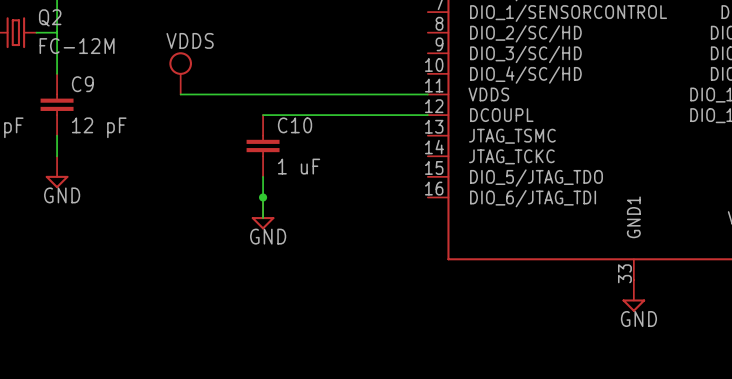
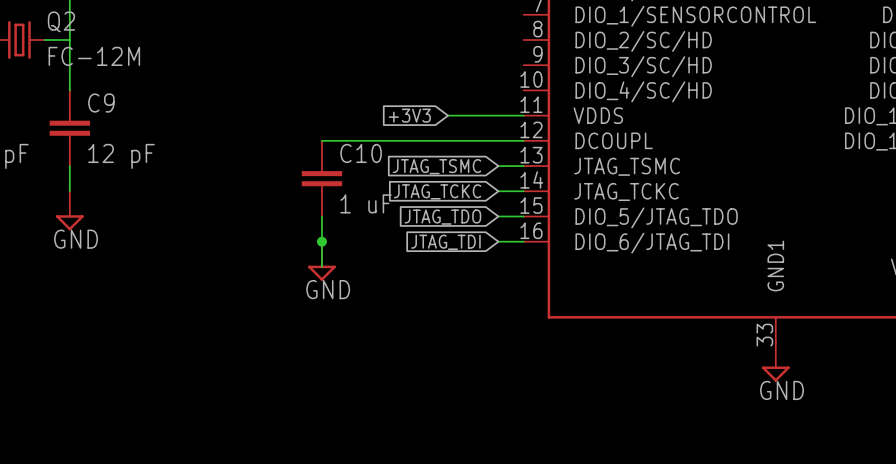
power symbol: VDDS (180, 73) -> none
wire: (180, 94) (366, 94) -> none
global label: none -> +3V3 (409, 115)
wire: none -> (498, 166) (523, 166)
global label: none -> JTAG_TSMC (437, 166)
global label: none -> JTAG_TCKC (437, 191)
wire: none -> (498, 191) (523, 191)
wire: none -> (498, 216) (523, 216)
global label: none -> JTAG_TDO (442, 217)
global label: none -> JTAG_TDI (445, 242)
wire: none -> (498, 241) (523, 241)

